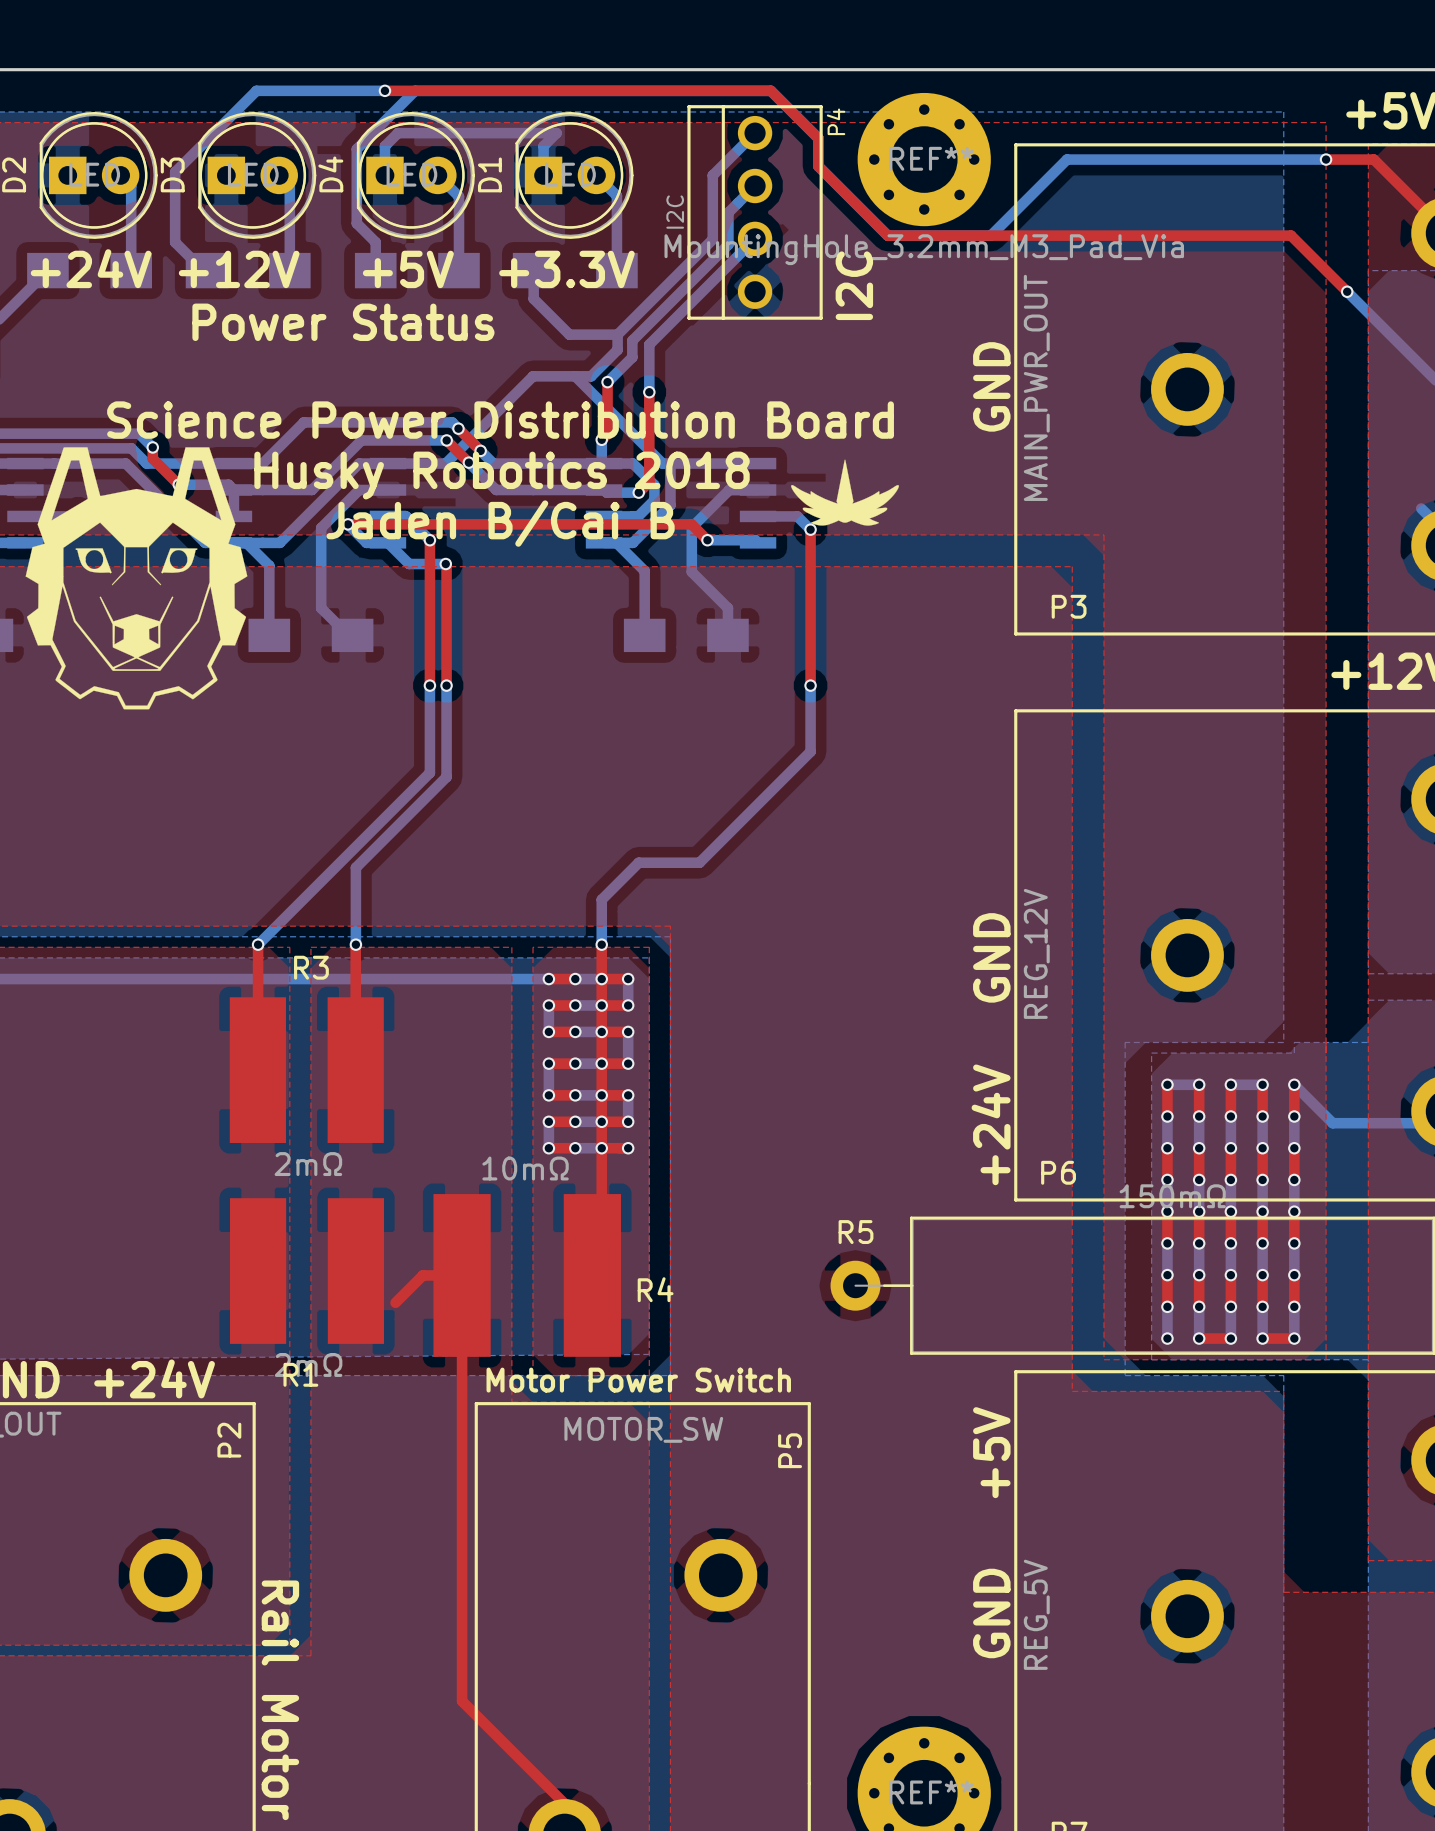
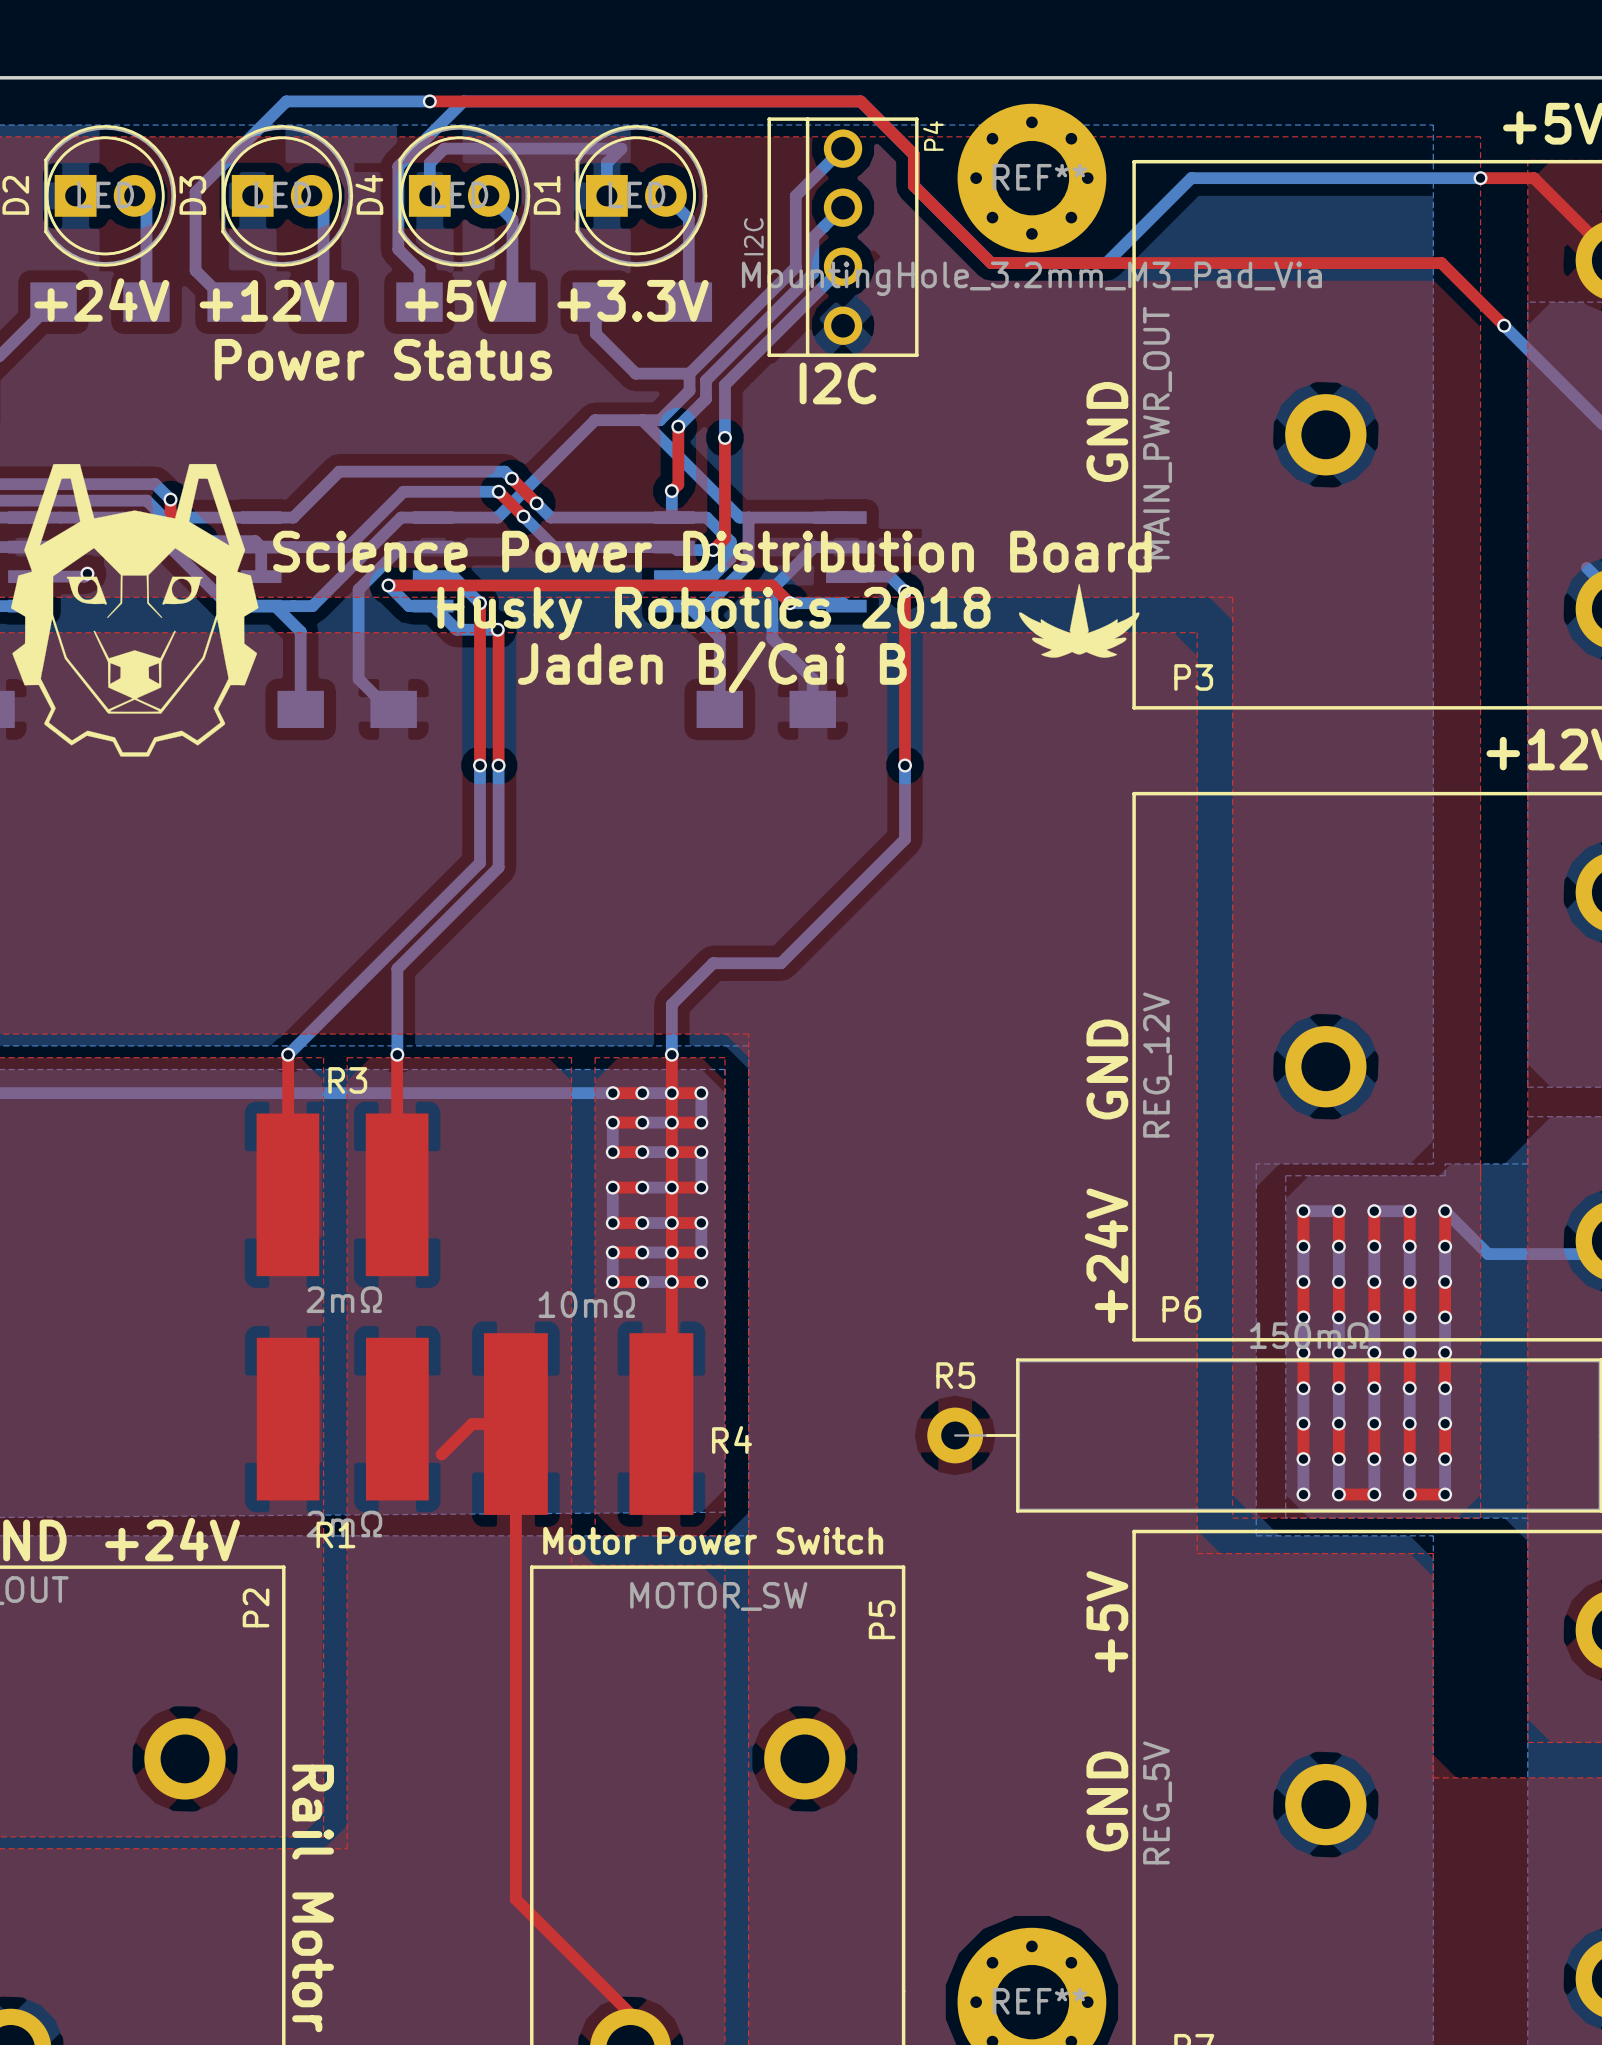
text rotation: 0° (854, 285) -> 90° clockwise (837, 383)
text position: I2C (854, 285) -> I2C (837, 383)
text position: Science Power Distribution Board (500, 420) -> Science Power Distribution Board (712, 551)
text position: Husky Robotics 2018 (502, 475) -> Husky Robotics 2018 (714, 613)
drawing position: (845, 492) -> (1079, 620)
text position: Jaden B/Cai B (500, 523) -> Jaden B/Cai B (712, 667)
drawing position: (136, 577) -> (134, 609)

